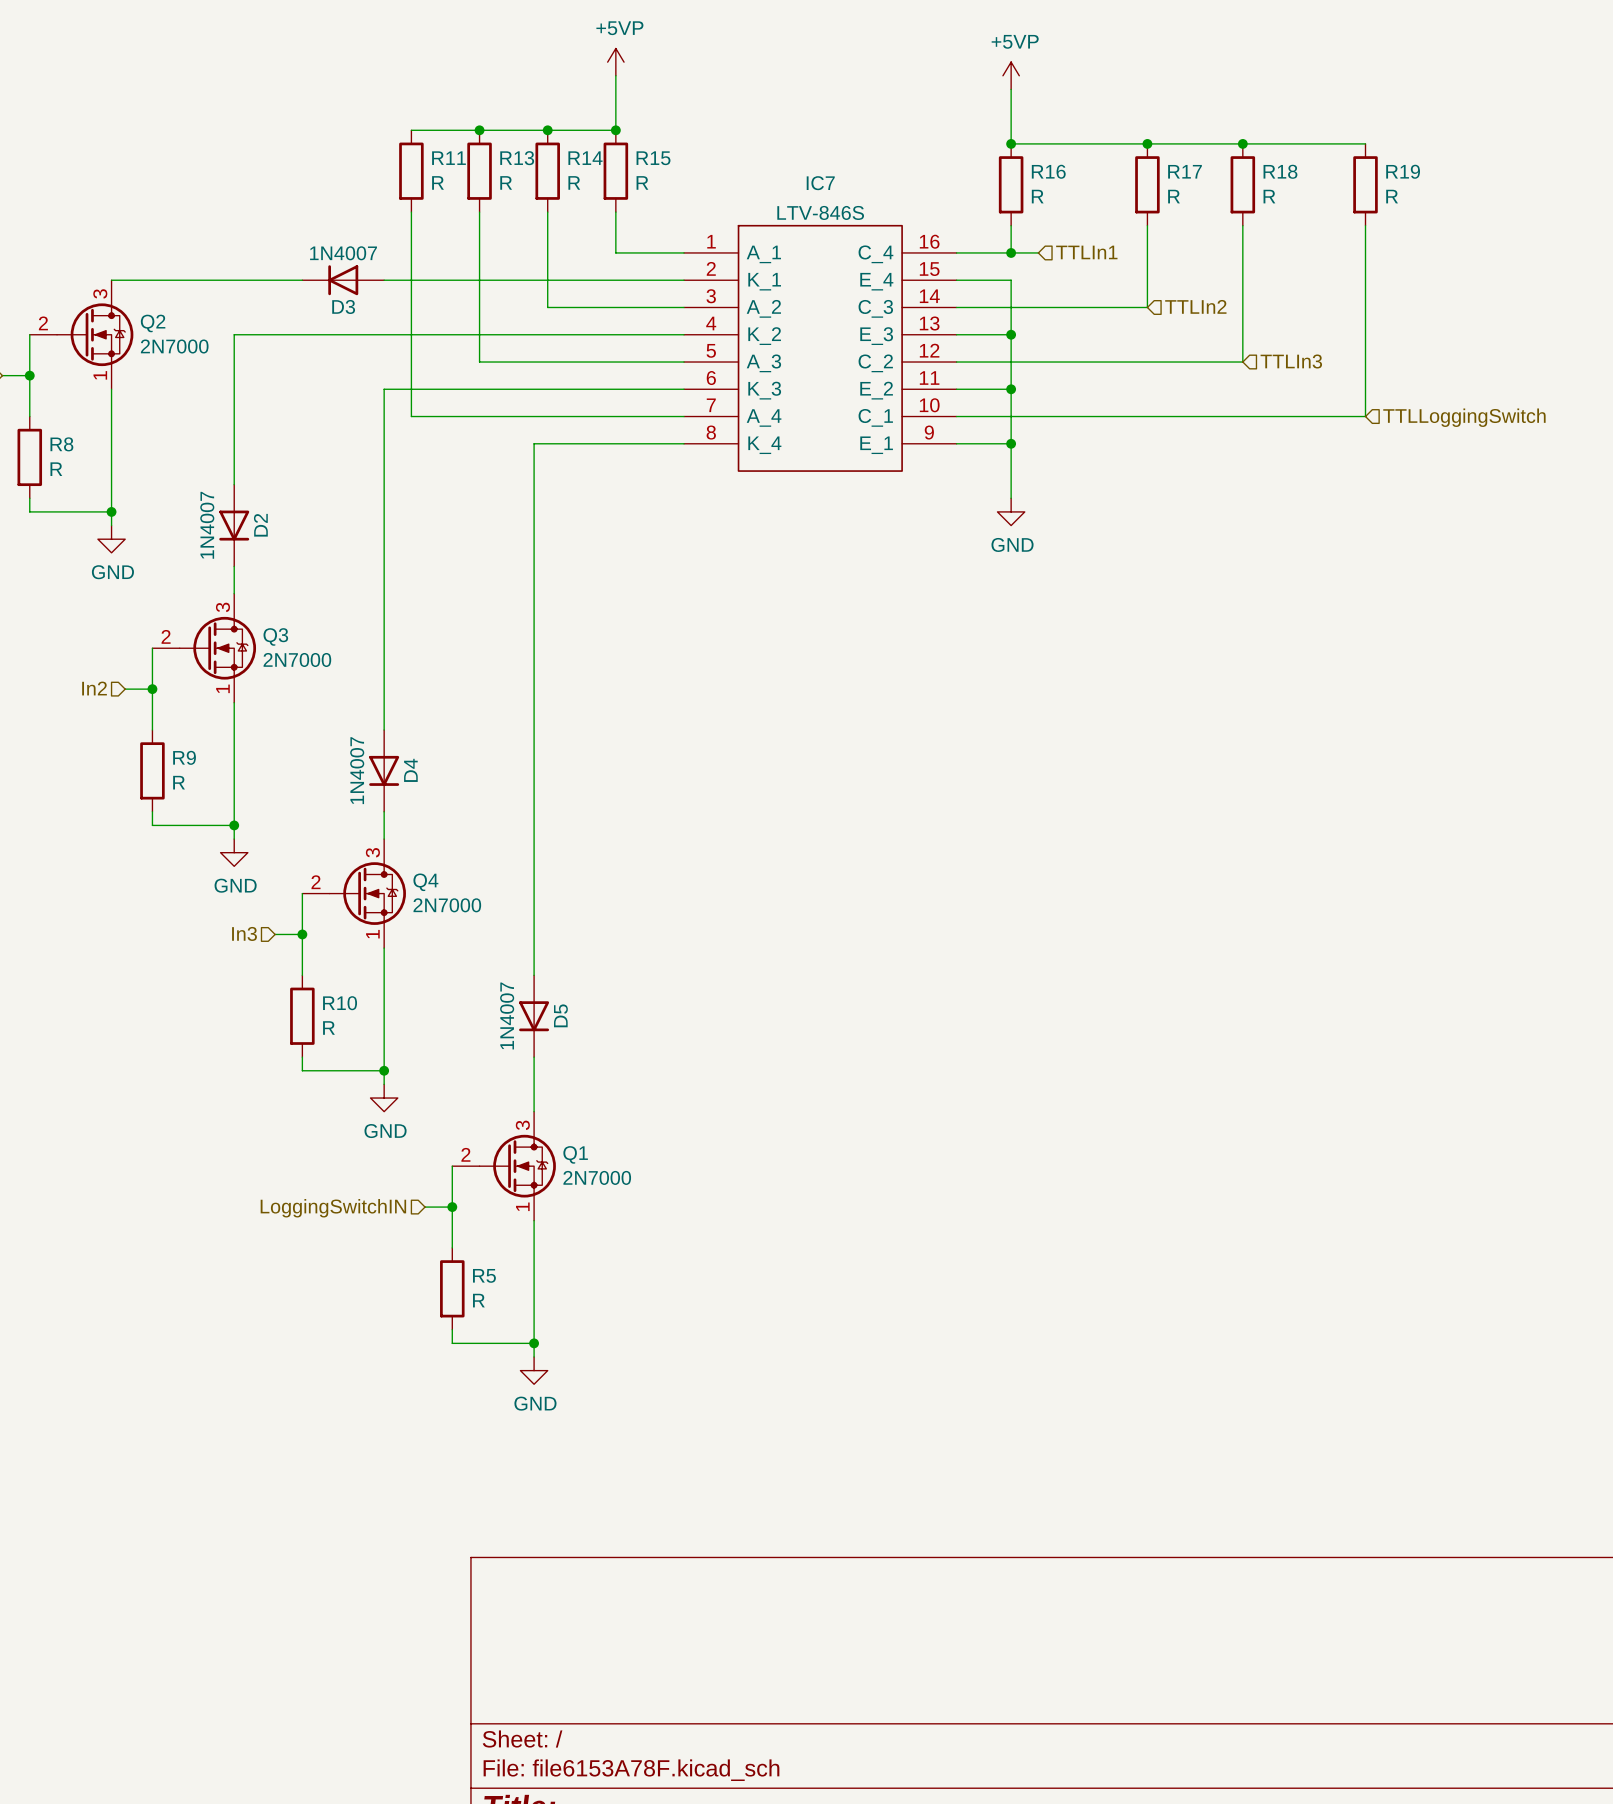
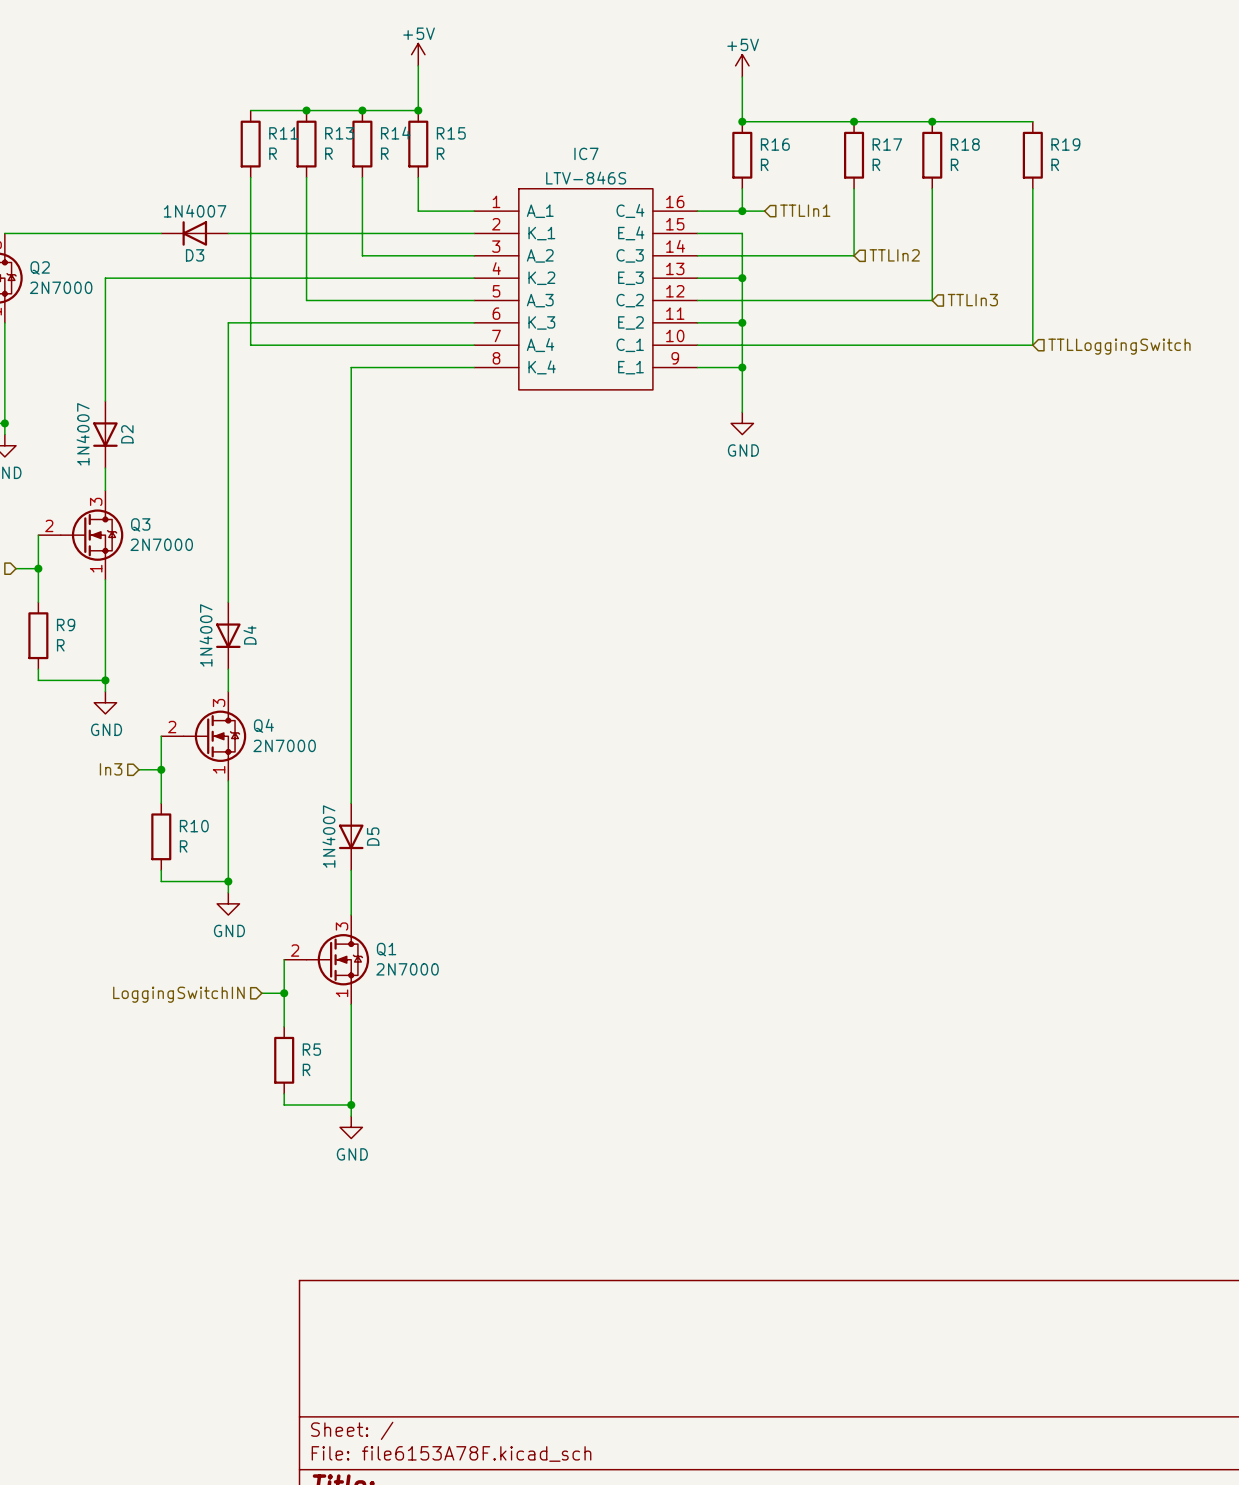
power symbol: +5VP (615, 62) -> +5V (418, 54)
power symbol: +5VP (1011, 75) -> +5V (742, 65)

